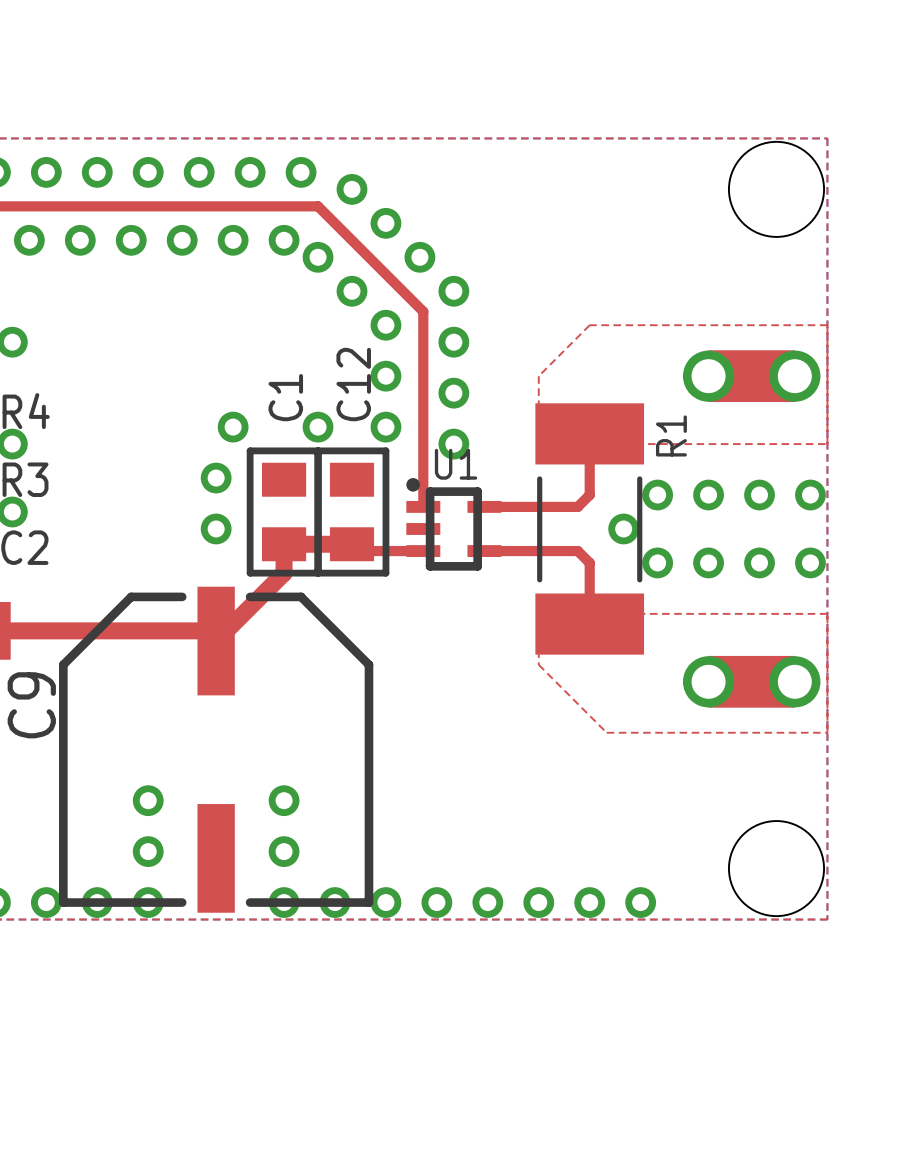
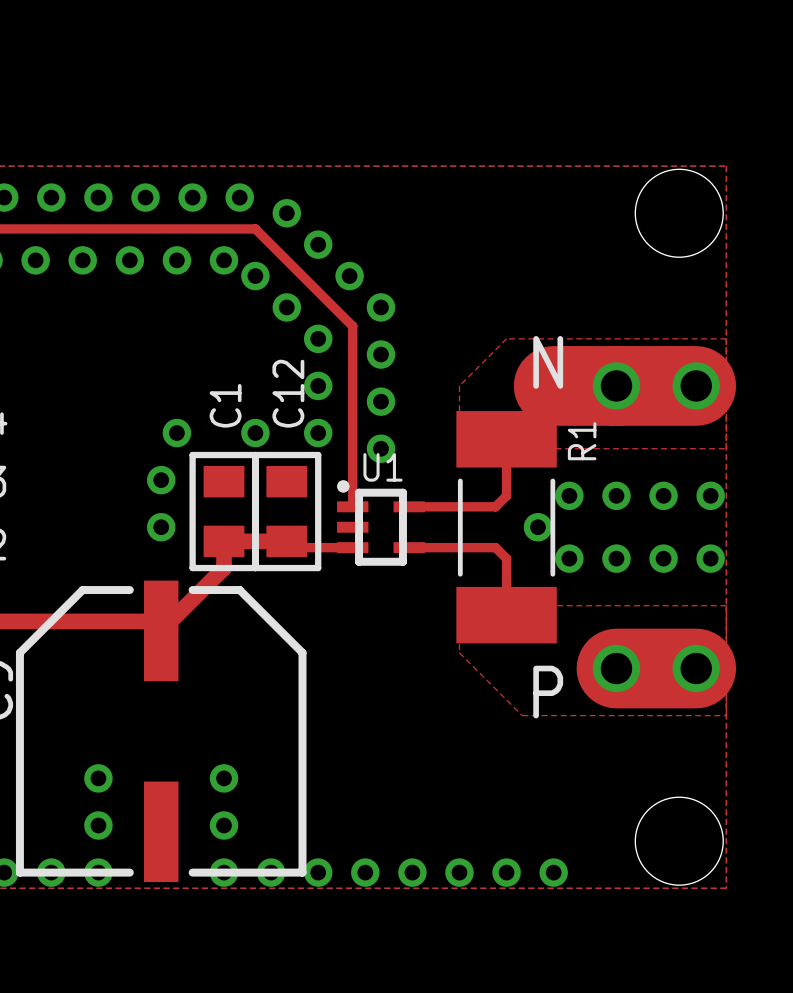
text: none -> N (548, 362)
top track: none -> (553, 385) (696, 385)
top track: none -> (616, 668) (696, 668)
text: none -> P (548, 692)

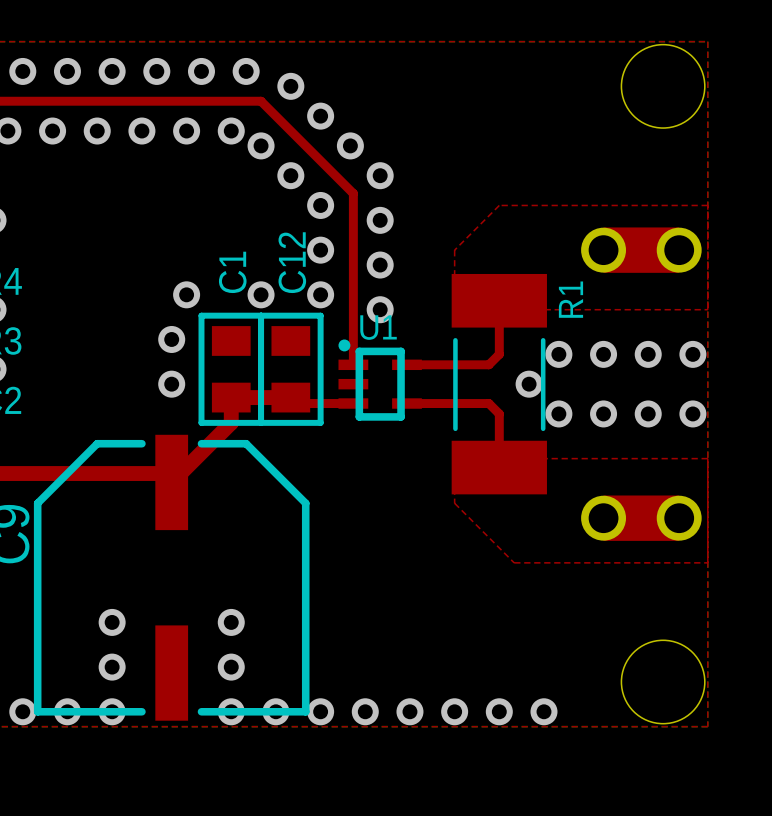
text: N (548, 362) -> none
top track: (553, 385) (696, 385) -> none
top track: (616, 668) (696, 668) -> none
text: P (548, 692) -> none

